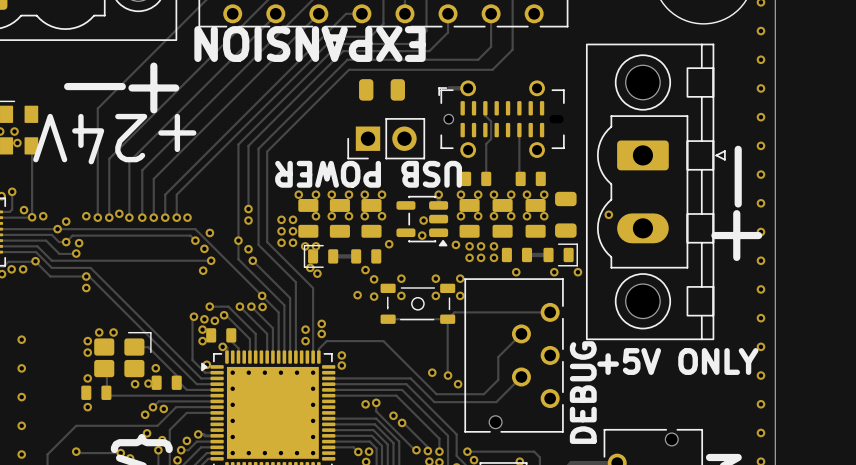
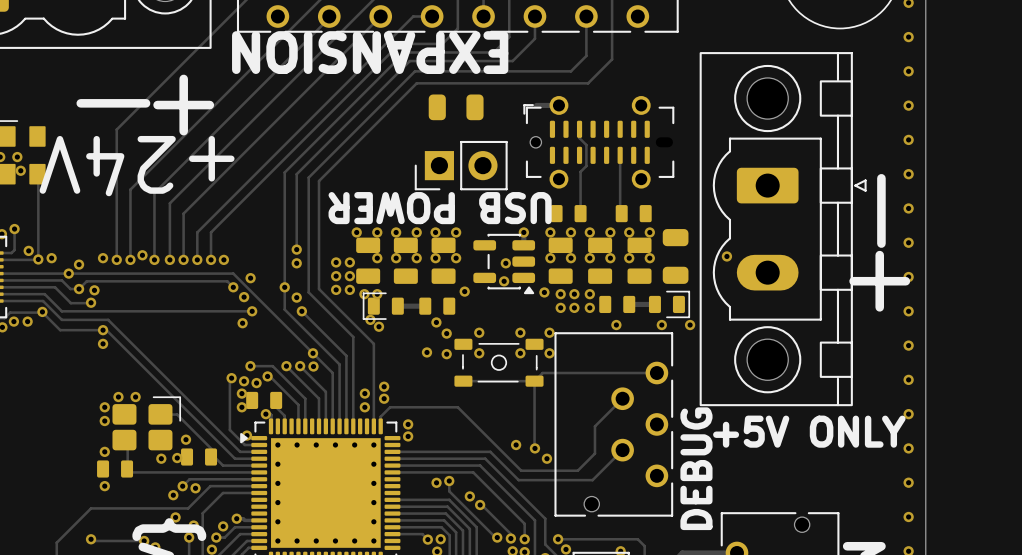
via: (21, 339) -> none
via: (21, 368) -> none
via: (21, 397) -> none
via: (21, 425) -> none
via: (21, 454) -> none

